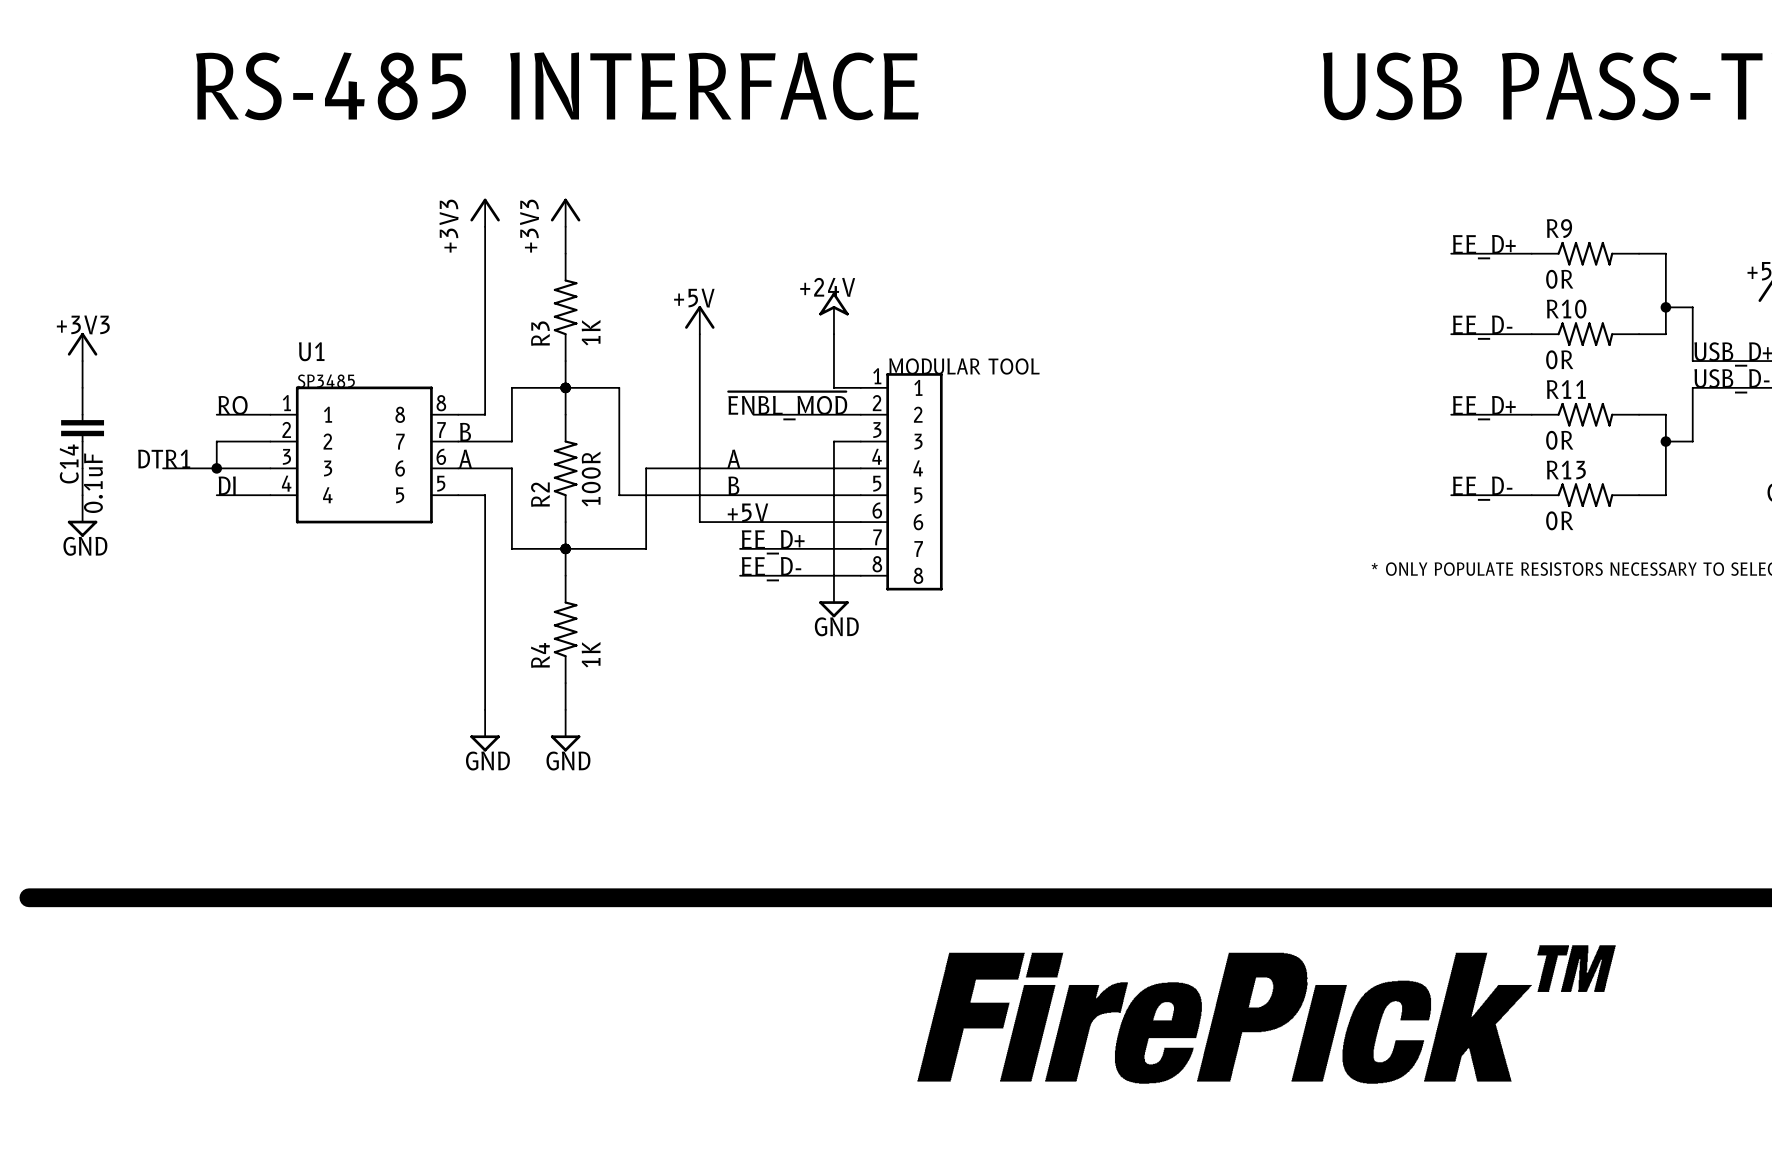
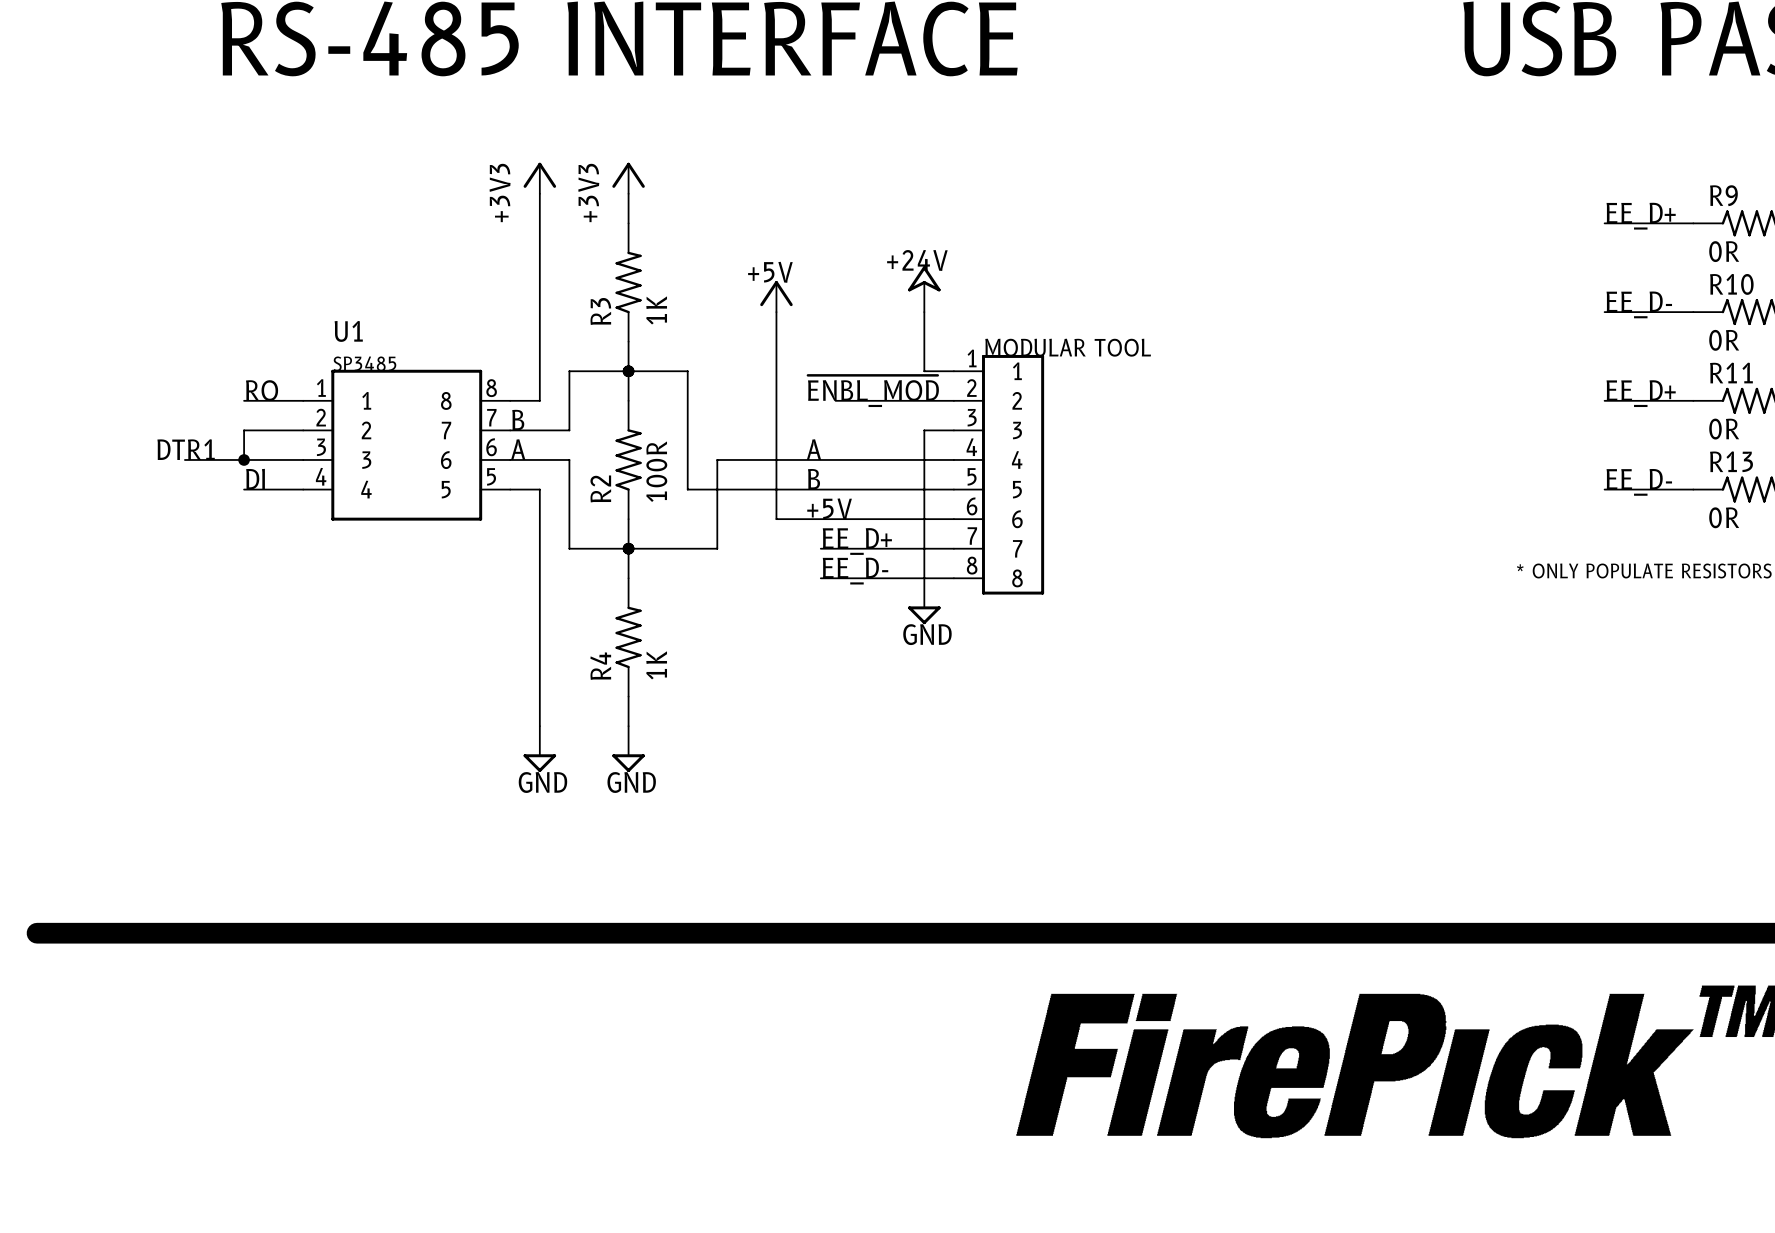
power symbol: +3V3 (82, 346) -> none
wire: (82, 361) (82, 387) -> none
C14: 0.1uF (82, 428) -> none
wire: (82, 468) (82, 495) -> none
power symbol: GND (82, 516) -> none

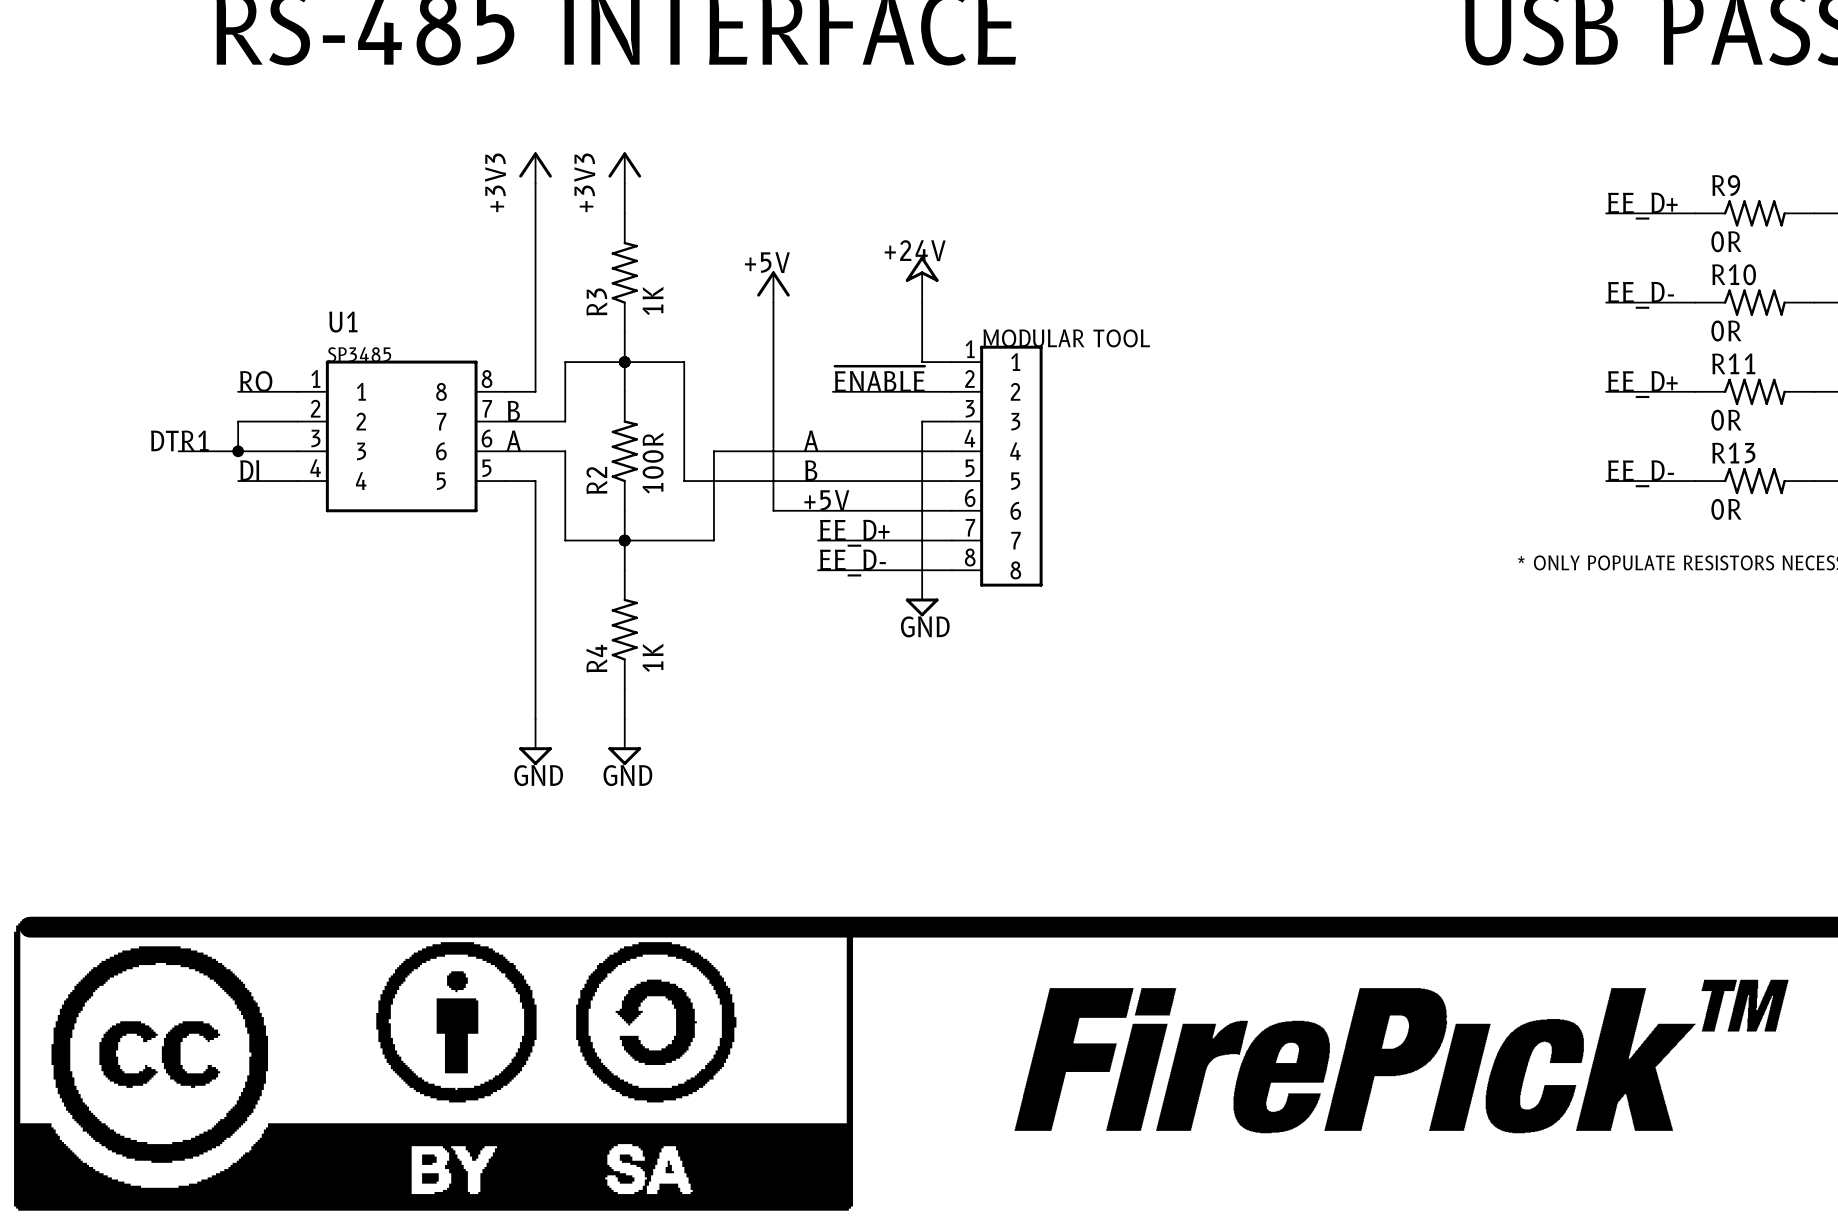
label: ~{ENBL_MOD} (873, 391) -> ~{ENABLE} (879, 379)
part: none -> (433, 1063)

